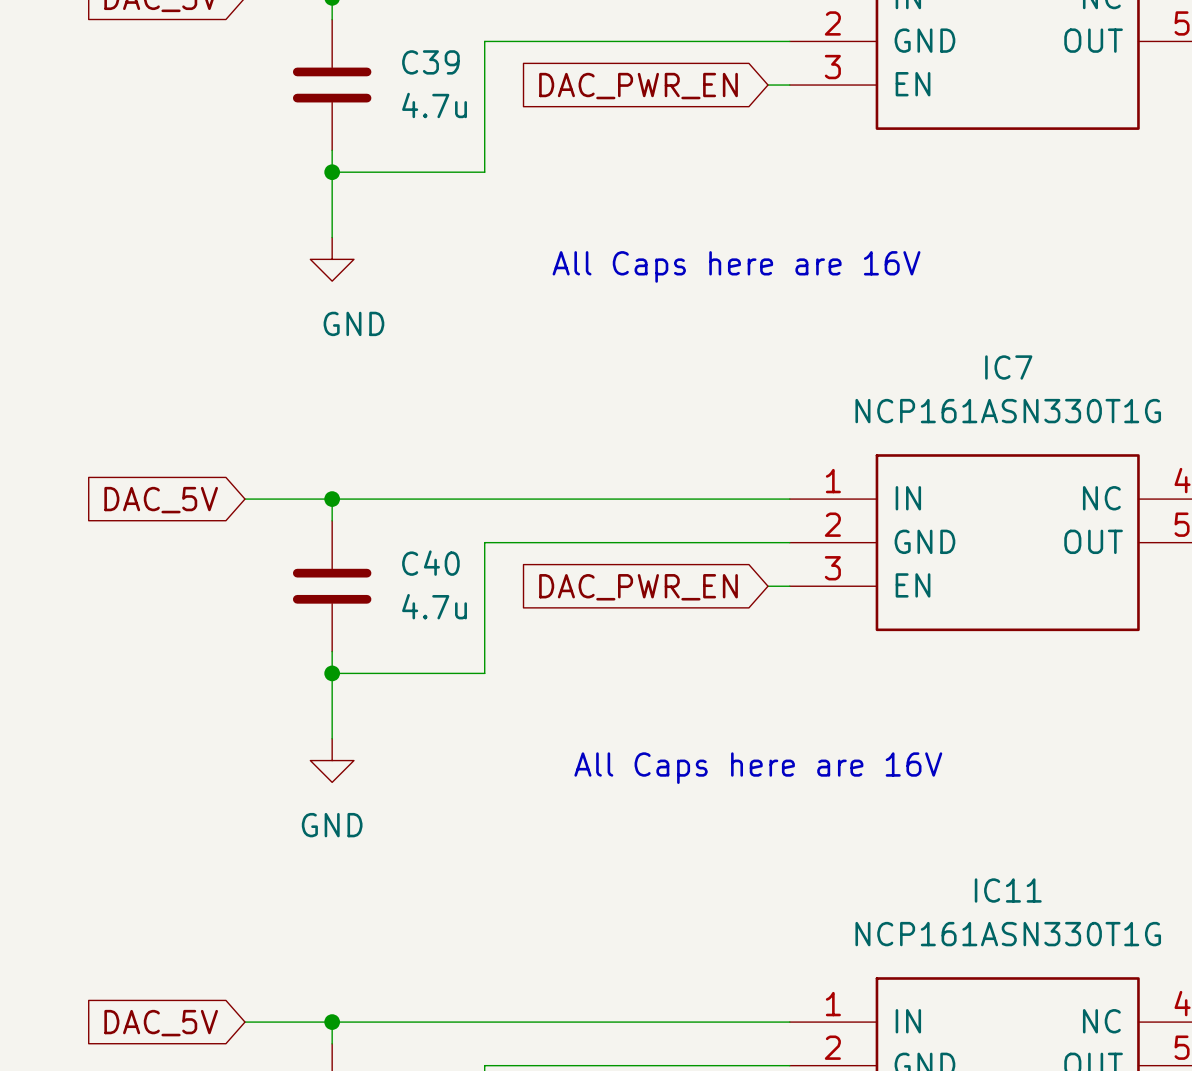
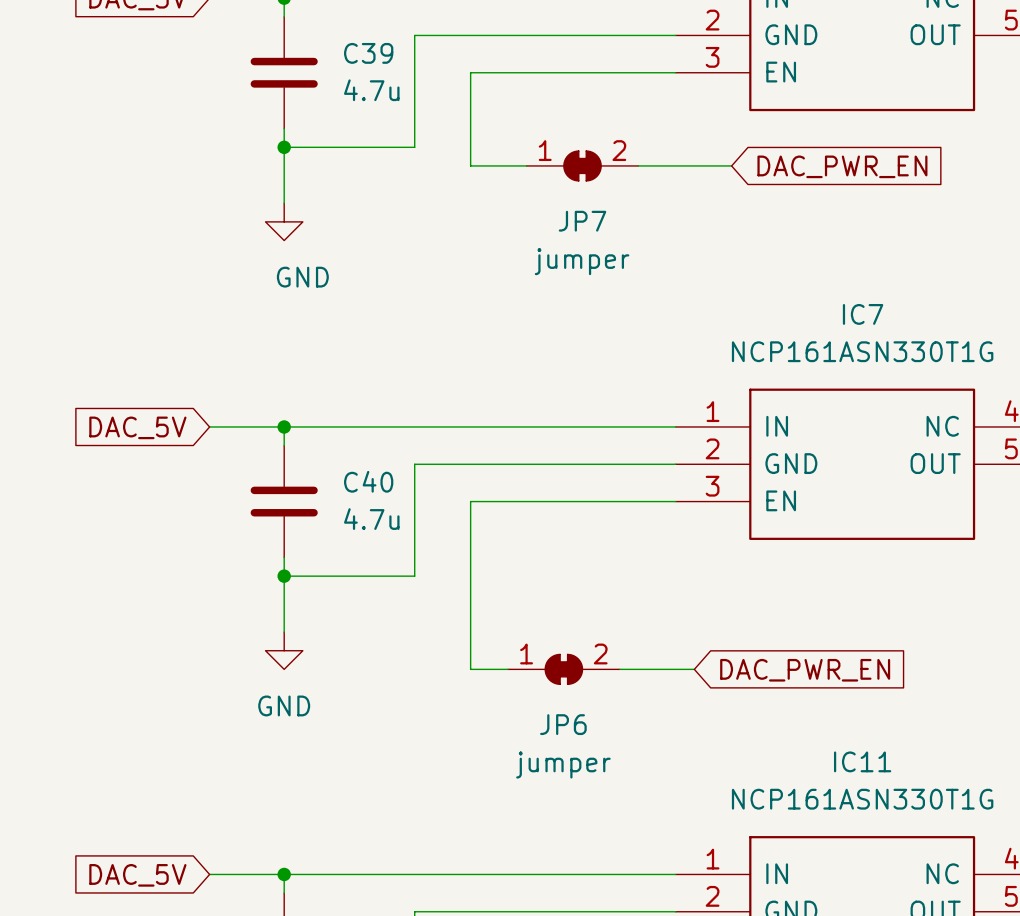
wire: none -> (657, 72) (470, 72) (470, 165) (526, 165)
global label rotation: 0° (638, 86) -> 180° (842, 166)
global label position: DAC_PWR_EN (638, 86) -> DAC_PWR_EN (842, 166)
JP7: none -> jumper (582, 165)
wire: none -> (638, 165) (731, 165)
text: All Caps here are 16V (736, 266) -> none
wire: none -> (657, 501) (470, 501) (470, 669) (507, 669)
global label: DAC_PWR_EN (638, 587) -> none
text: All Caps here are 16V (758, 768) -> none
JP6: none -> jumper (563, 669)
wire: none -> (619, 669) (694, 669)
global label: none -> DAC_PWR_EN (805, 670)

